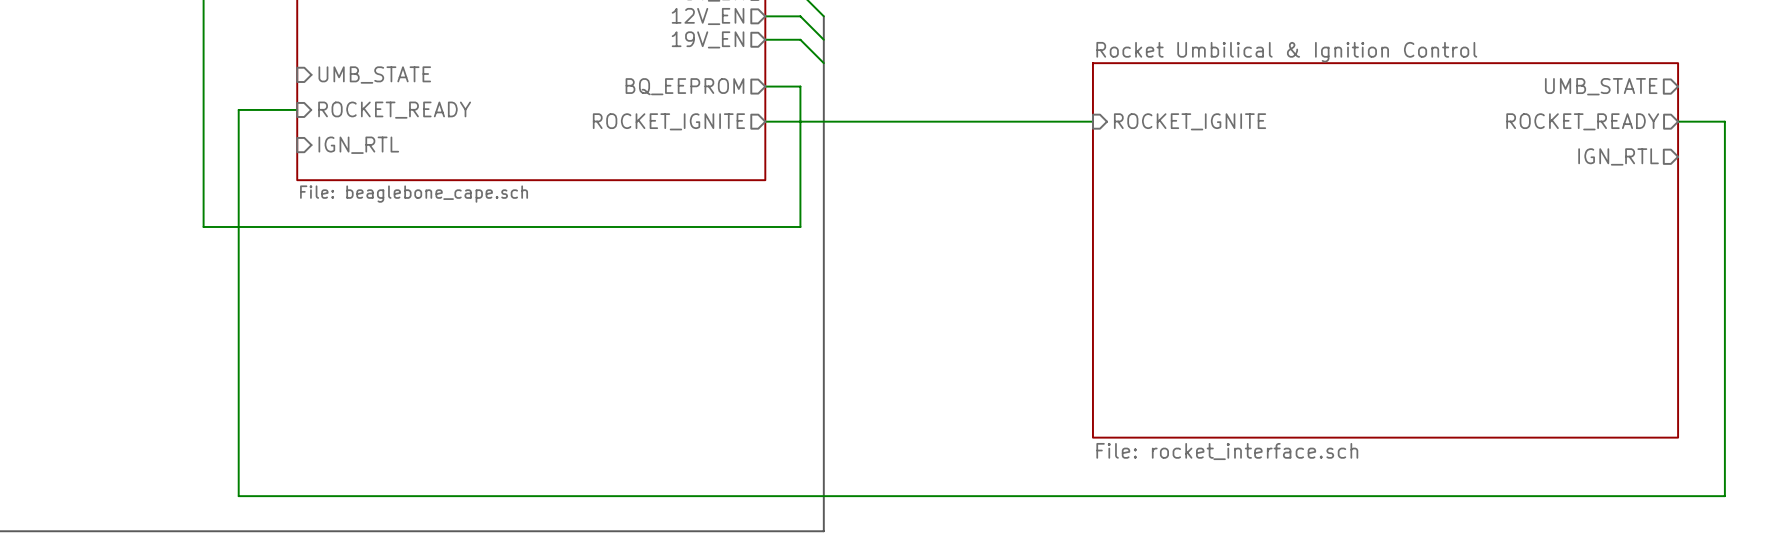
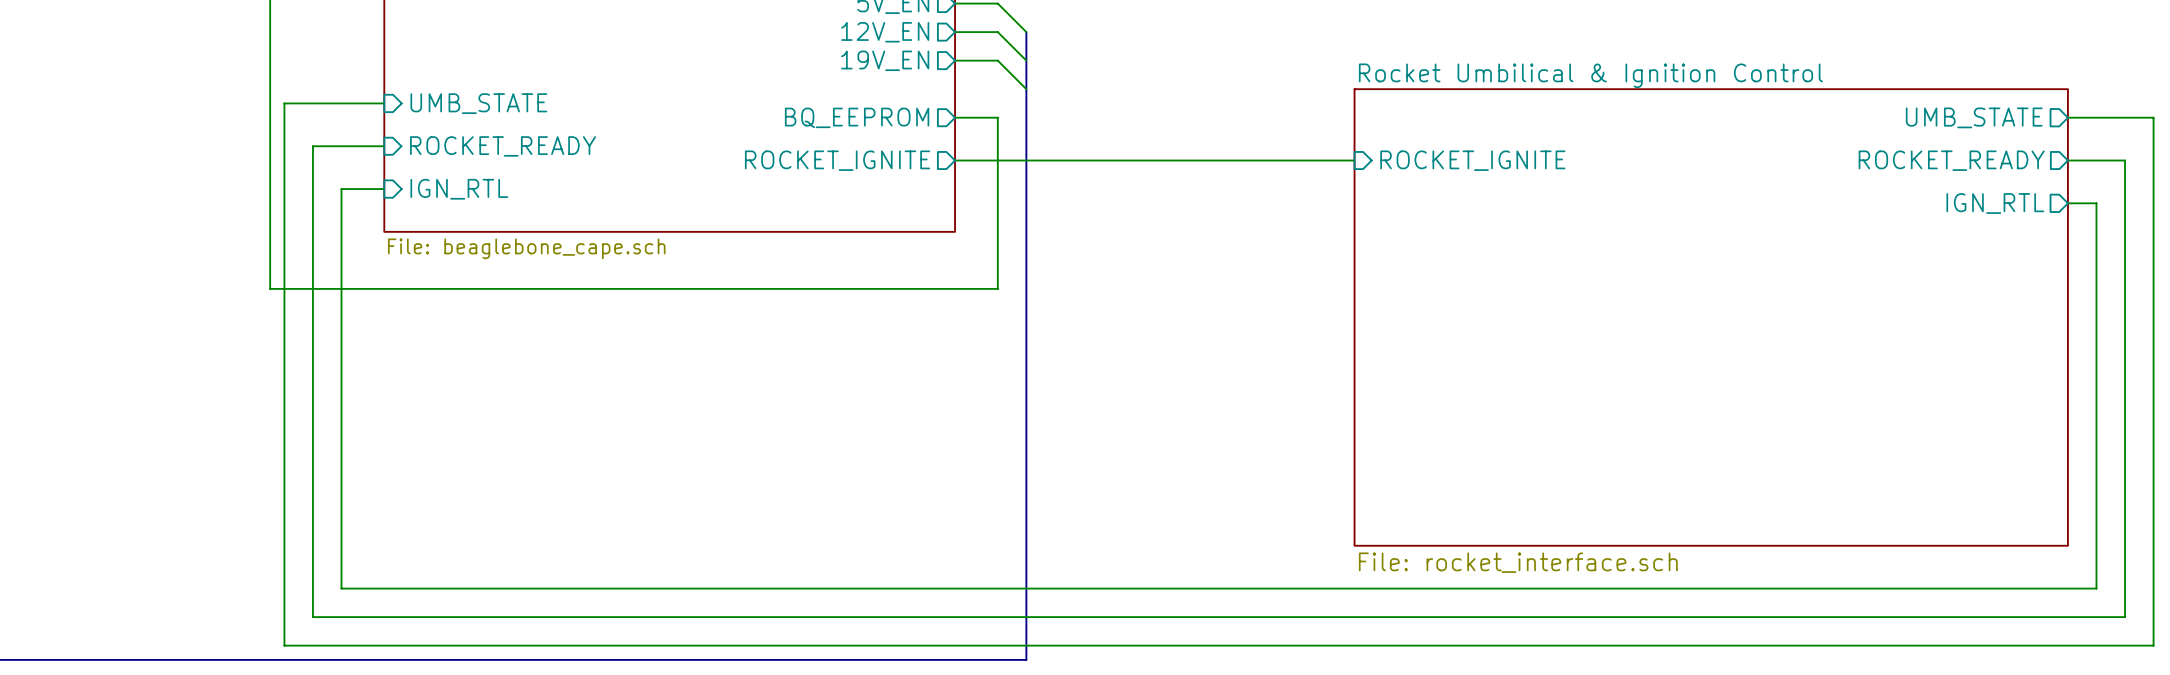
wire: none -> (384, 103) (284, 103) (284, 645) (2153, 645) (2153, 117) (2067, 117)
wire: none -> (384, 189) (341, 189) (341, 588) (2096, 588) (2096, 203) (2067, 203)

